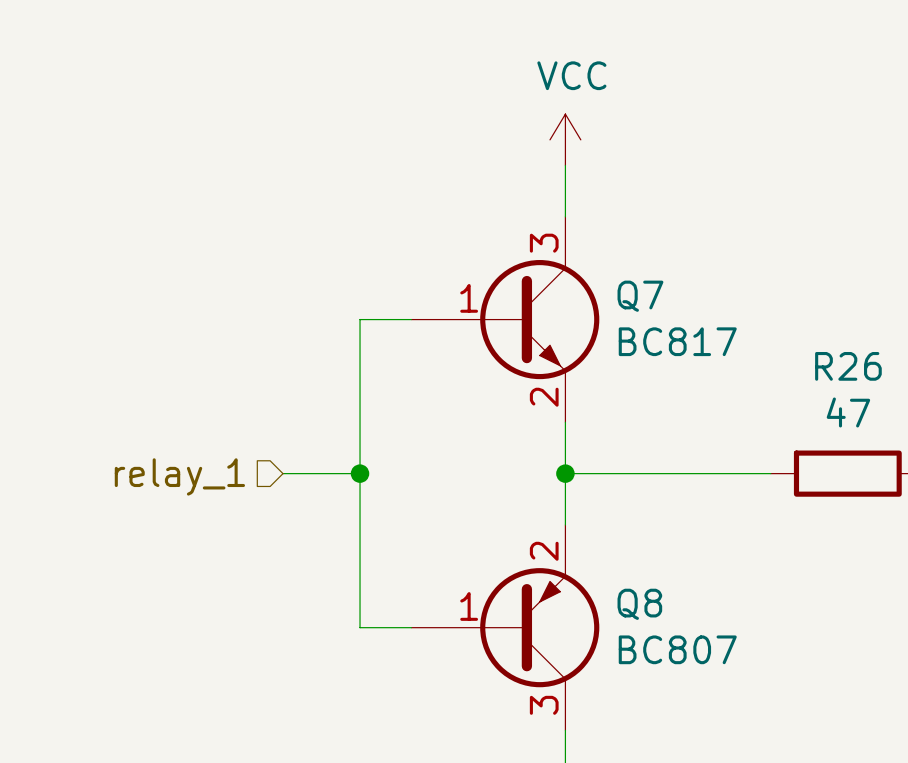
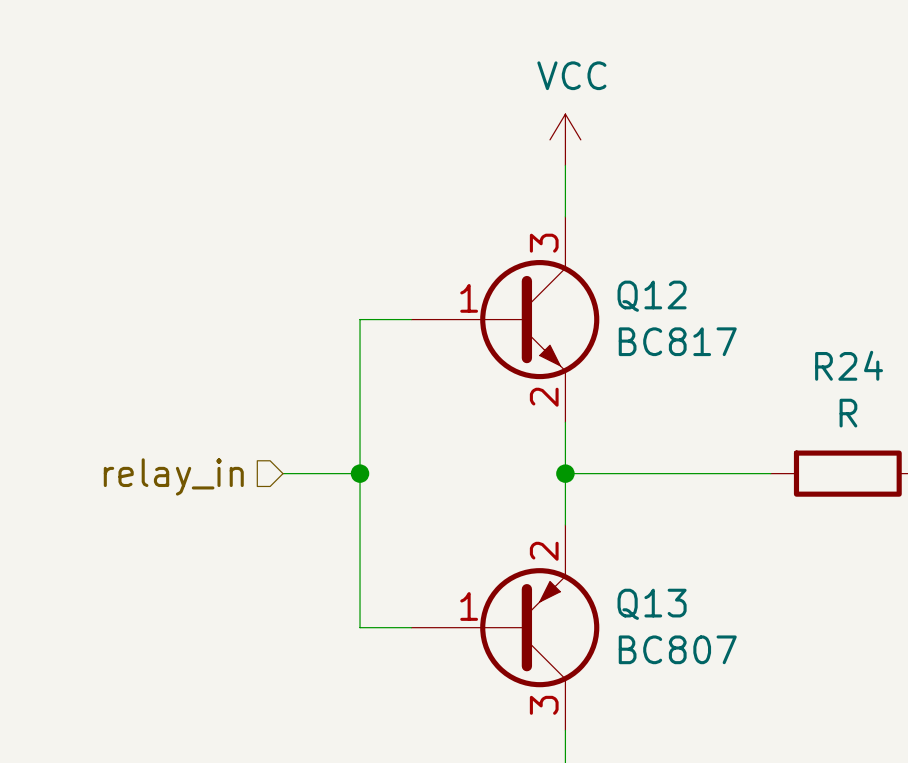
Q7 name: Q7 (640, 296) -> Q12 (652, 296)
R26 name: R26 (848, 366) -> R24 (849, 365)
R26 value: 47 (848, 412) -> R (848, 413)
hierarchical label: relay_1 (179, 476) -> relay_in (173, 476)
Q8 name: Q8 (639, 604) -> Q13 (652, 604)

